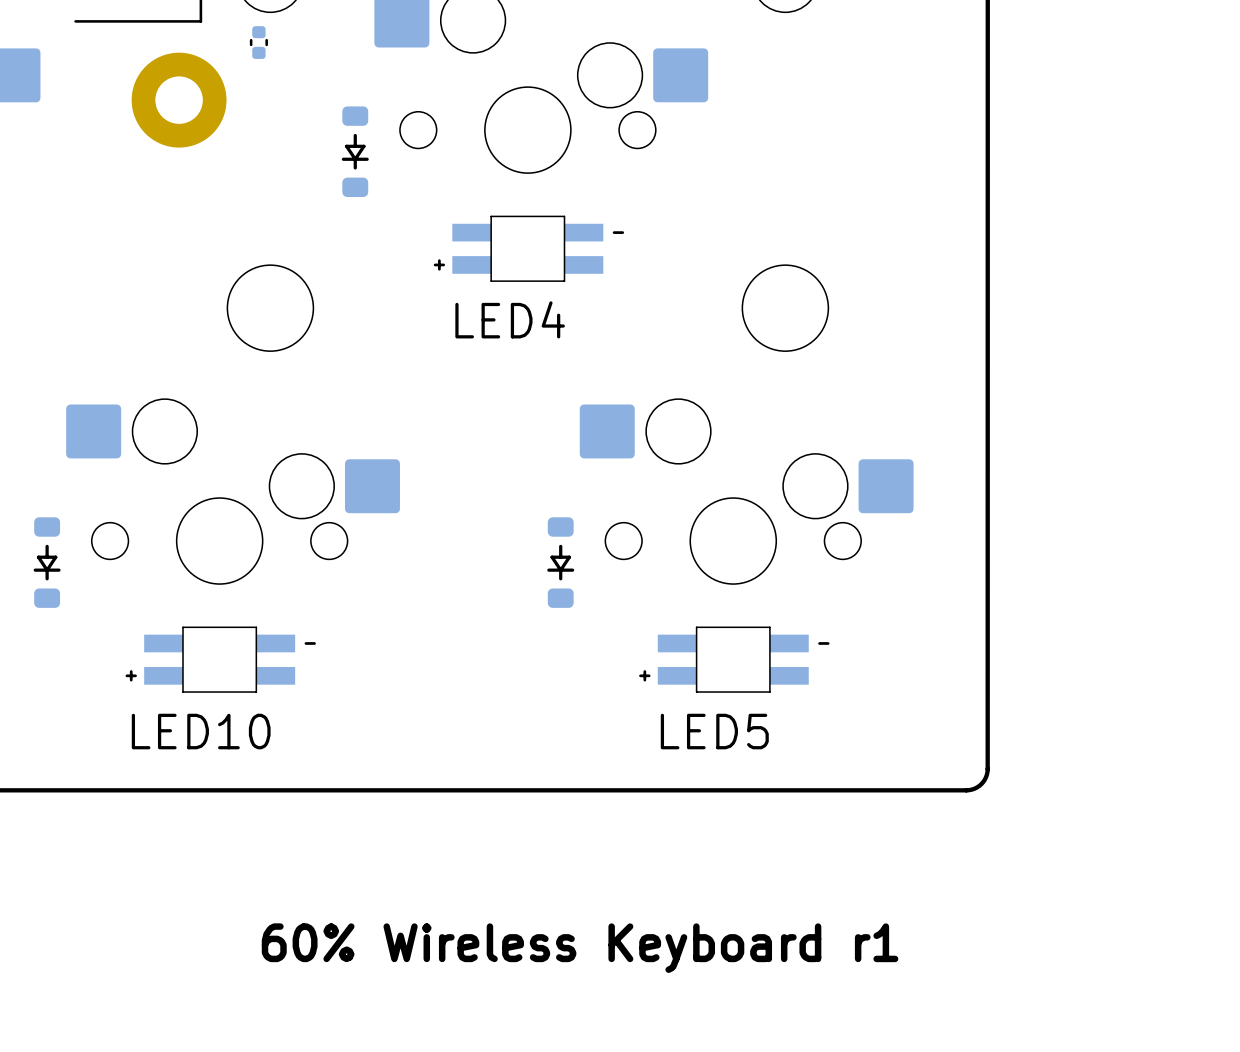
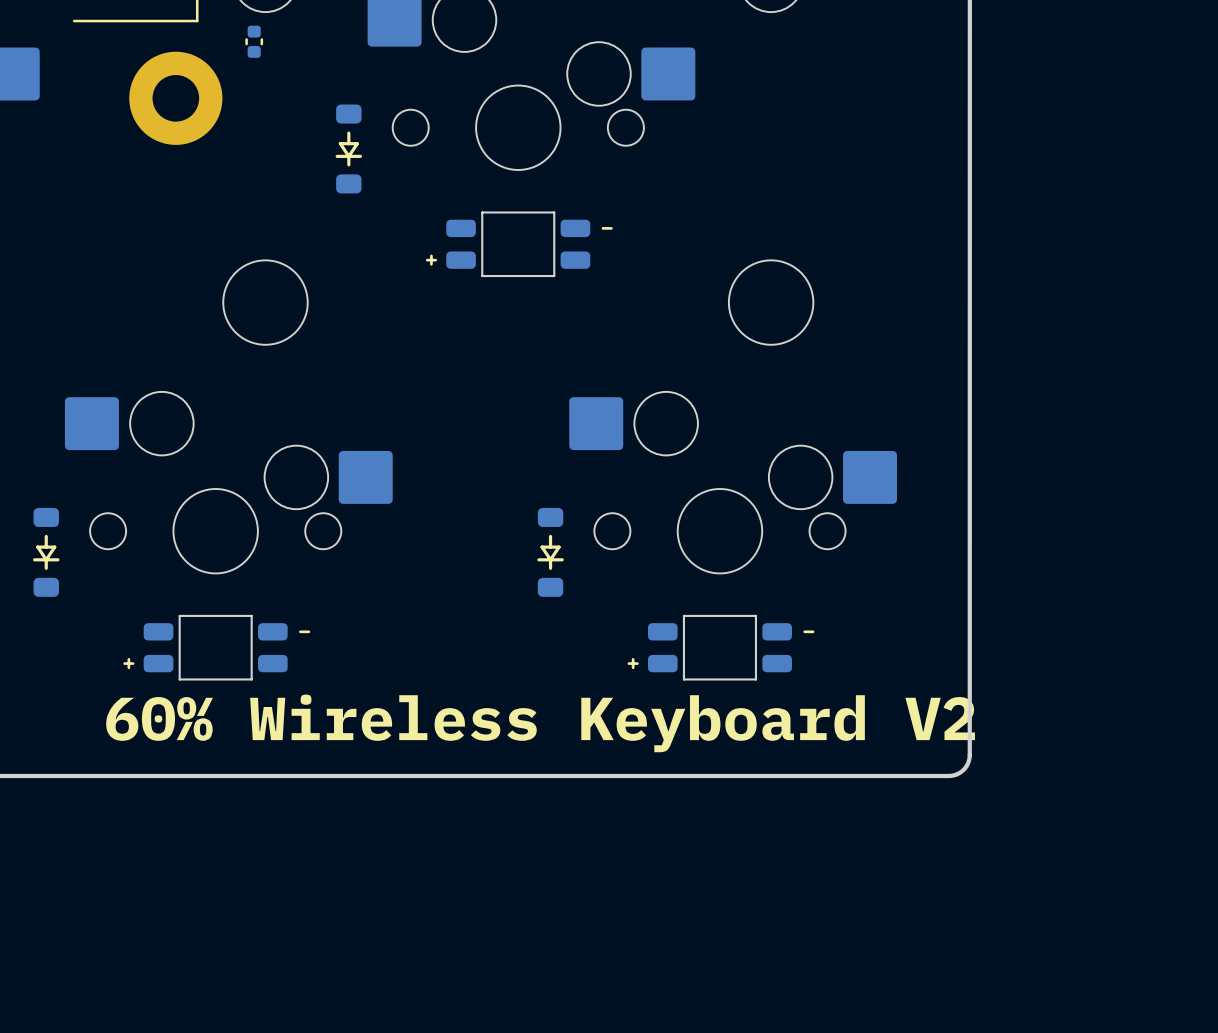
LED4: (528, 248) -> none
part: none -> (519, 244)
LED10: (220, 659) -> none
part: none -> (216, 647)
LED5: (734, 659) -> none
part: none -> (721, 647)
text: none -> 60% Wireless Keyboard V2 (540, 723)
text: 60% Wireless Keyboard r1 (580, 948) -> none

